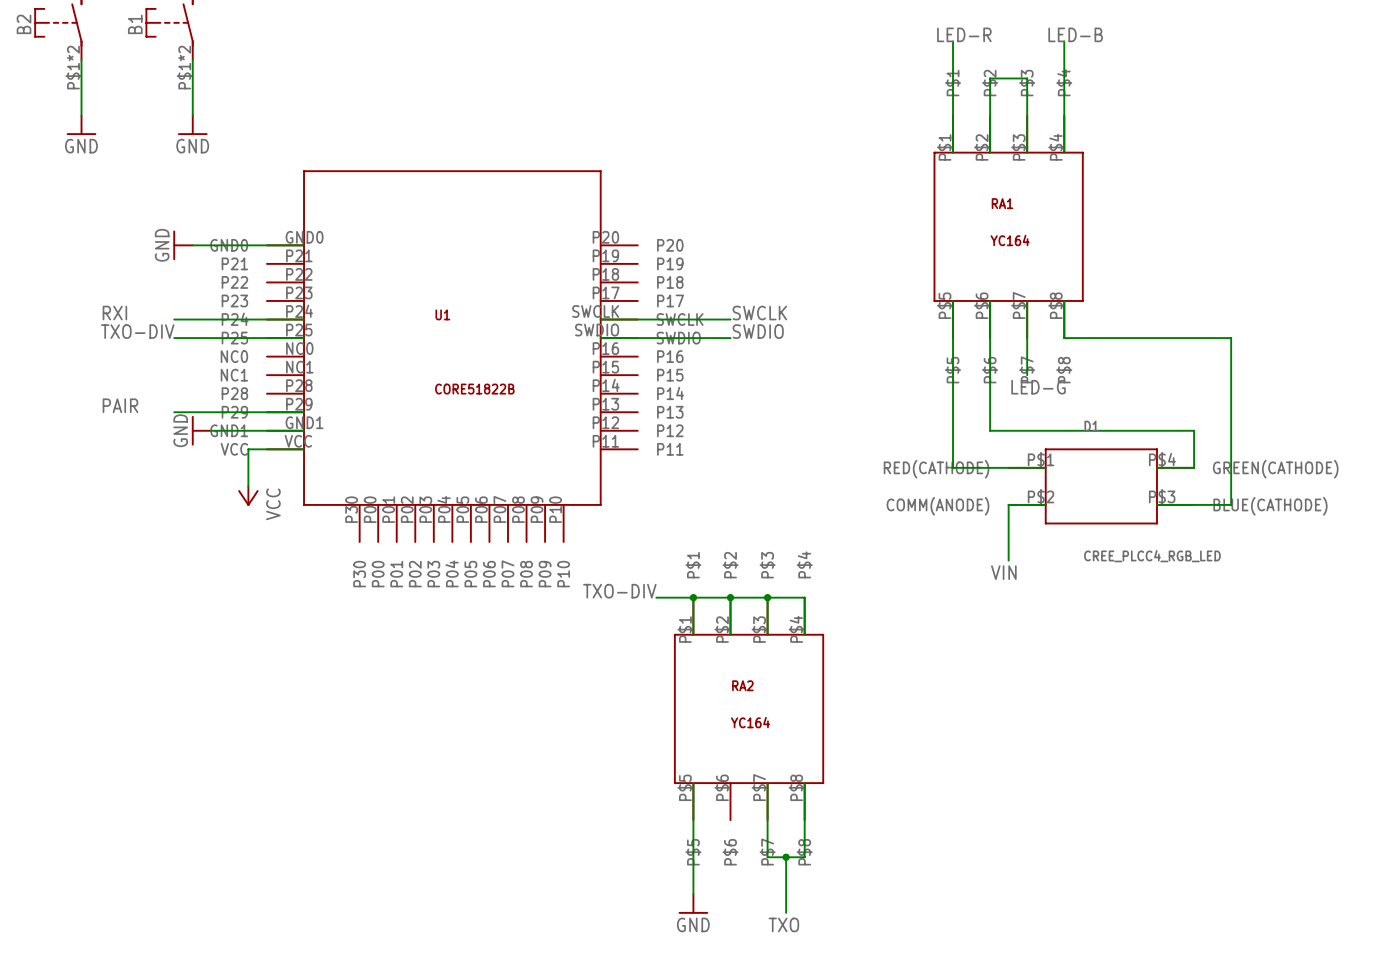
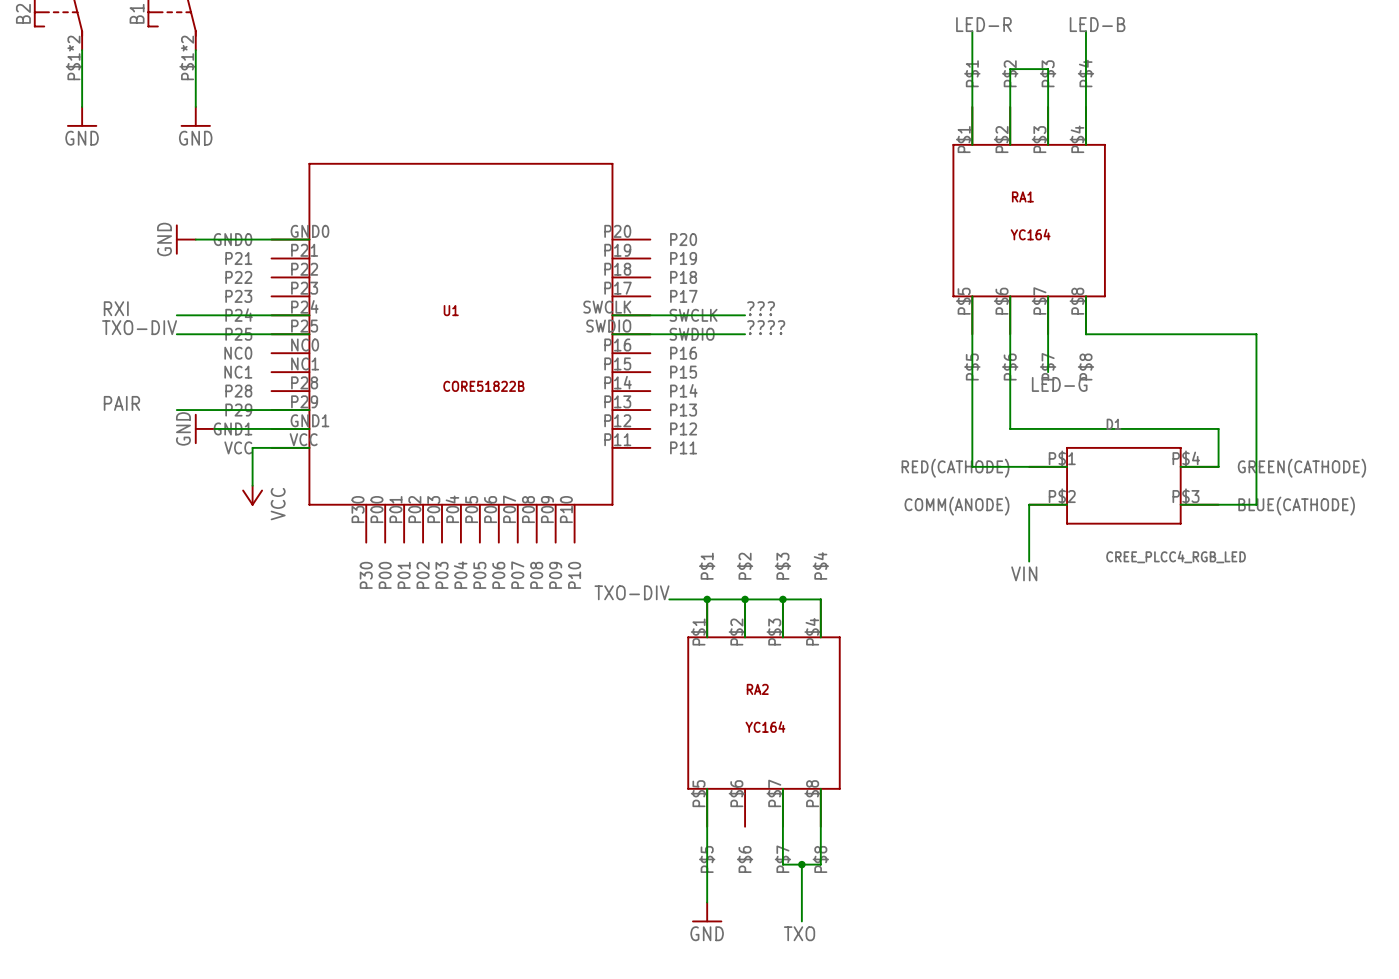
label: SWCLK (759, 313) -> ??? (761, 308)
label: SWDIO (758, 331) -> ???? (766, 327)

